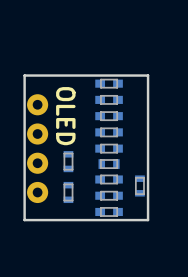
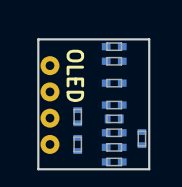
part: (109, 116) -> none
part: none -> (114, 83)
part: (109, 132) -> none

